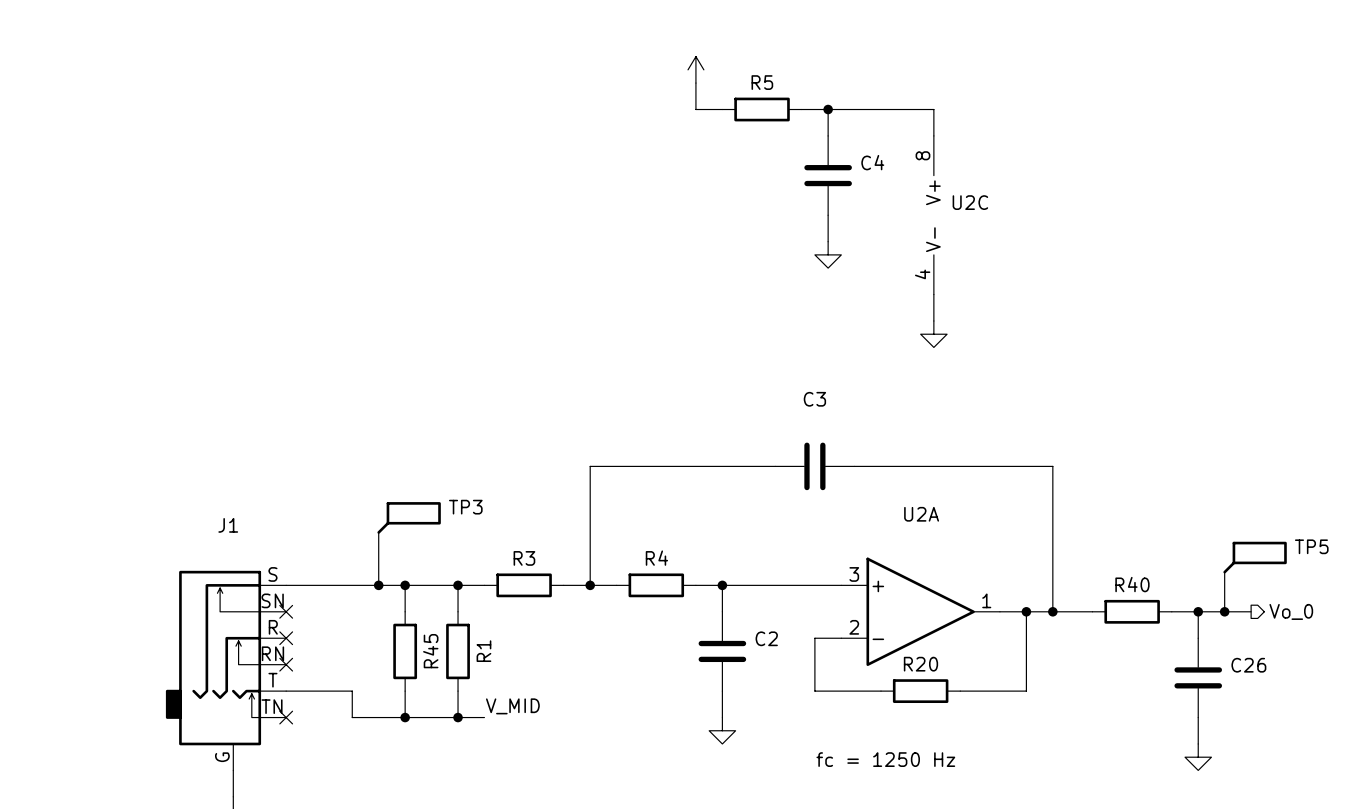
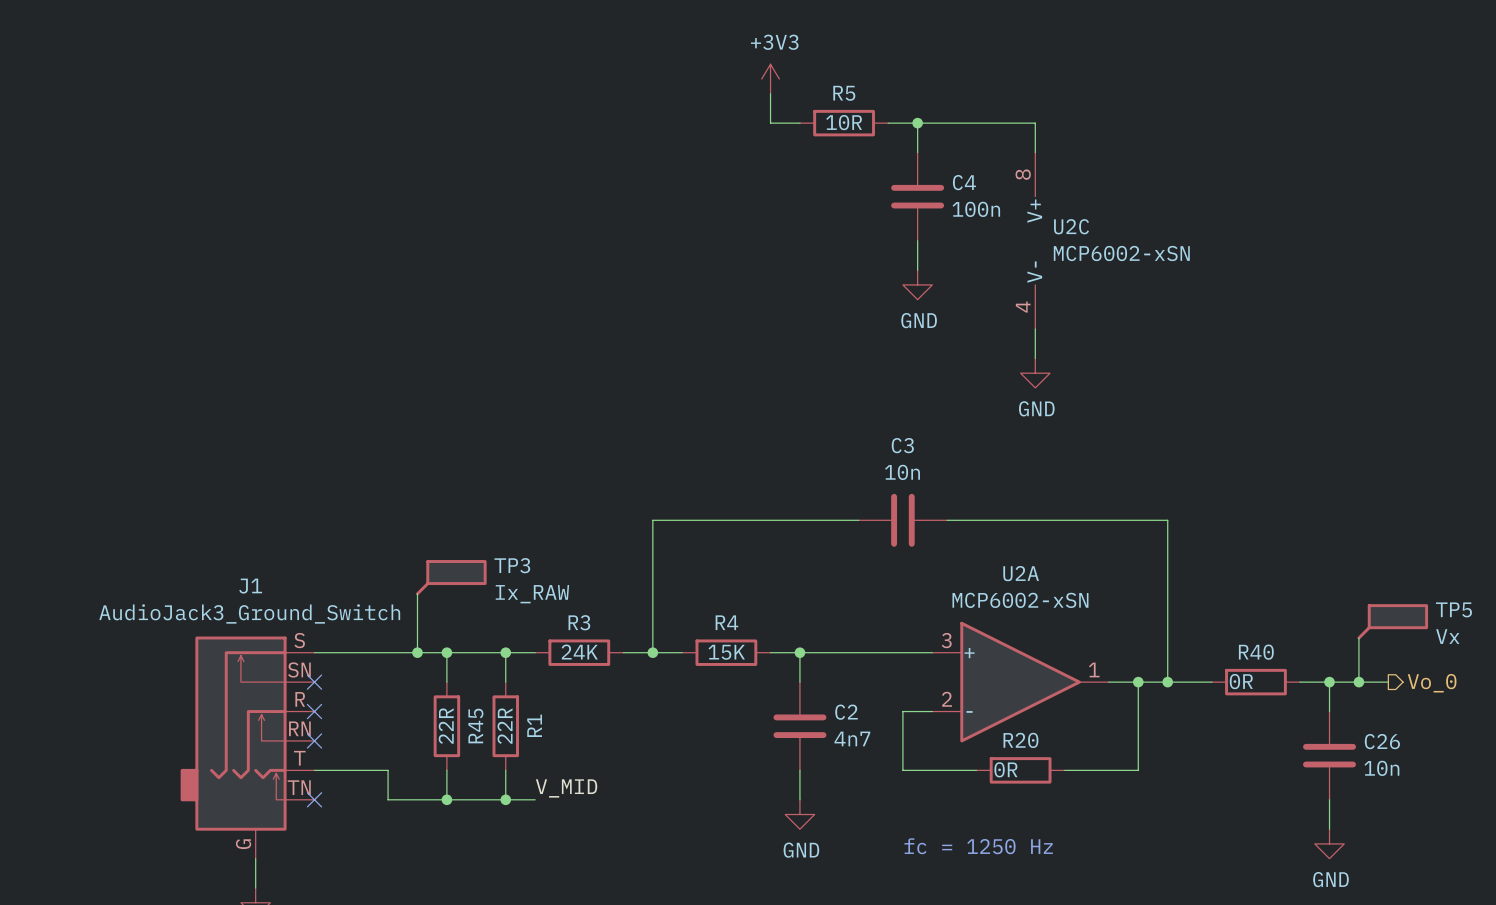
power symbol text: none -> +3V3 (774, 42)
R5 value: none -> 10R (844, 122)
C4 value: none -> 100n (976, 209)
U2C value: none -> MCP6002-xSN (1121, 253)
power symbol text: none -> GND (919, 320)
power symbol text: none -> GND (1036, 408)
C3 value: none -> 10n (902, 472)
TP3 value: none -> Ix_RAW (532, 594)
U2A value: none -> MCP6002-xSN (1020, 600)
J1 value: none -> AudioJack3_Ground_Switch (249, 613)
TP5 value: none -> Vx (1447, 636)
R3 value: none -> 24K (579, 652)
R4 value: none -> 15K (726, 652)
R40 value: none -> 0R (1241, 681)
R45 value: none -> 22R (446, 726)
R1 value: none -> 22R (505, 726)
C2 value: none -> 4n7 (852, 738)
C26 value: none -> 10n (1381, 768)
R20 value: none -> 0R (1005, 769)
power symbol text: none -> GND (801, 850)
power symbol text: none -> GND (1330, 879)

